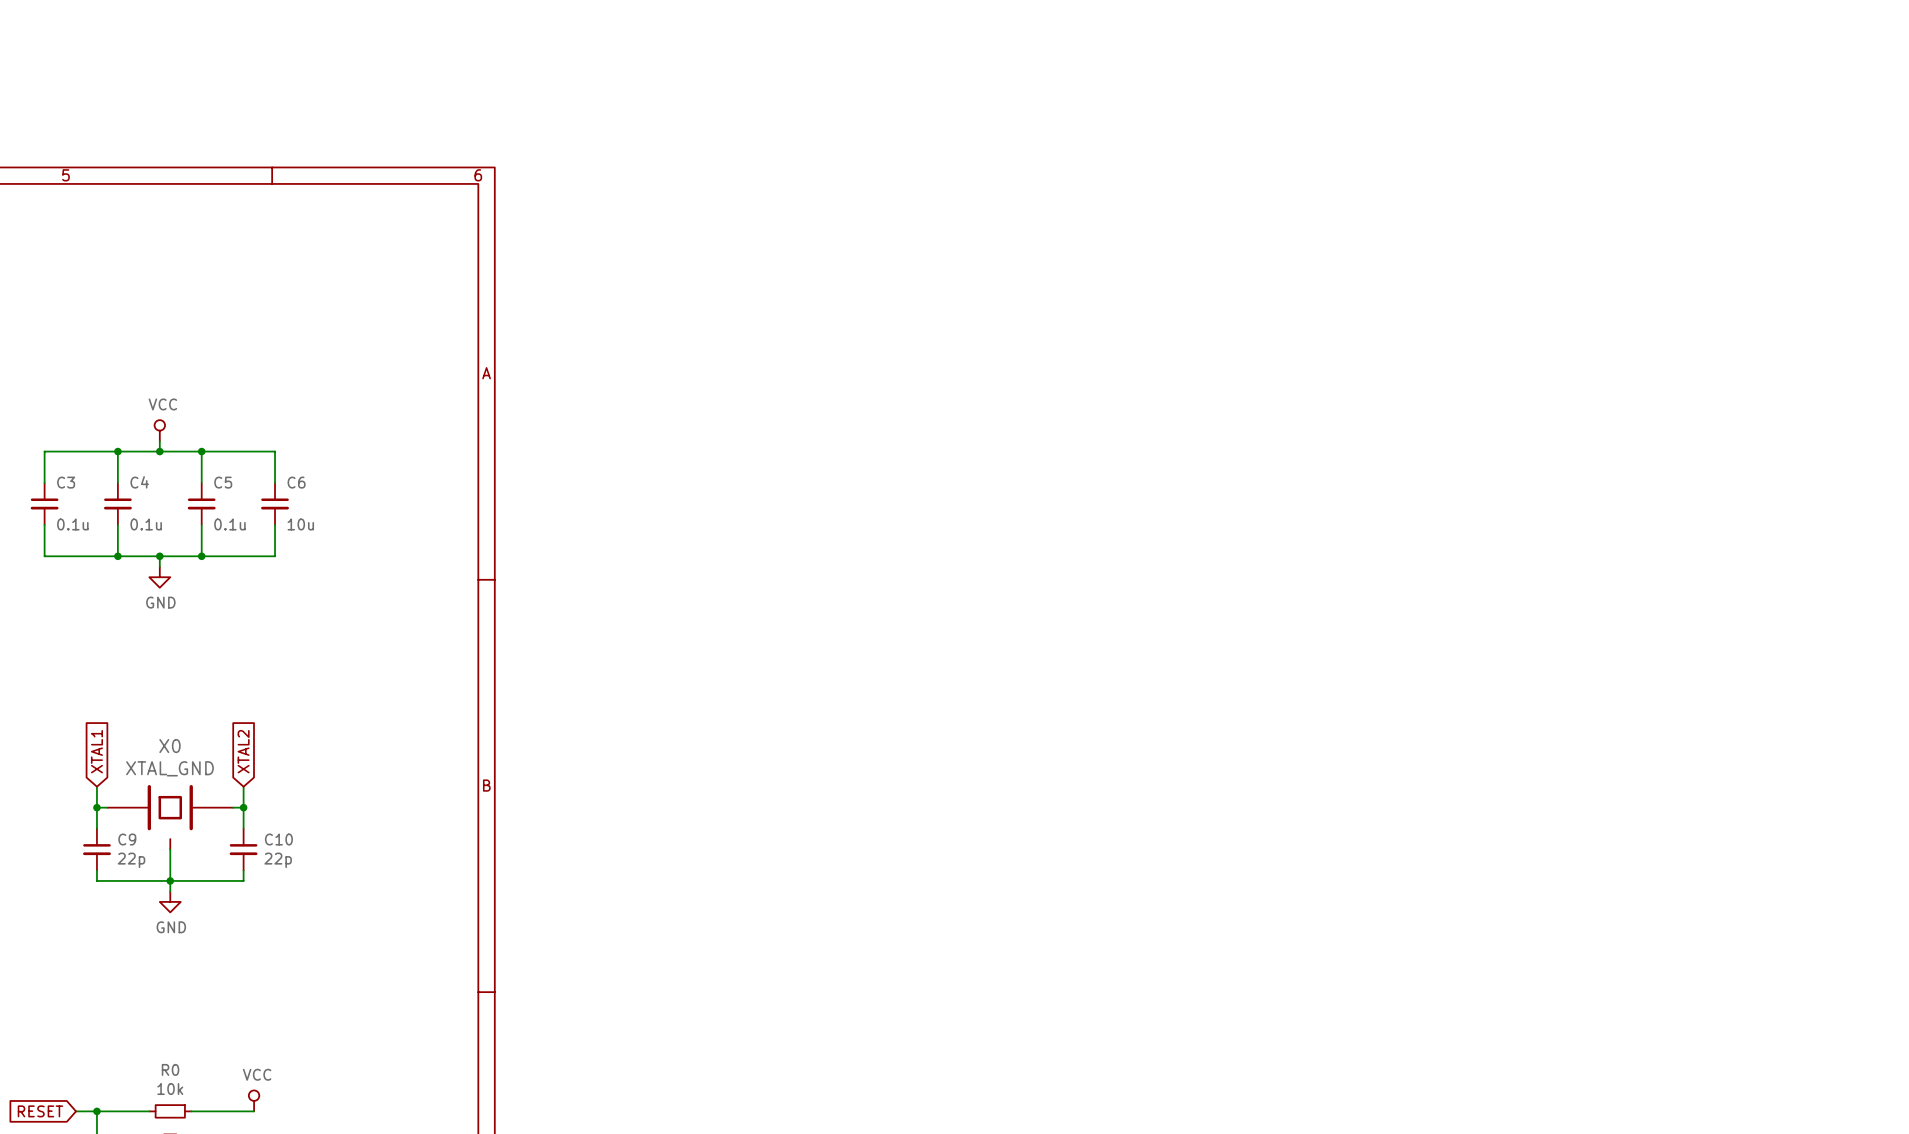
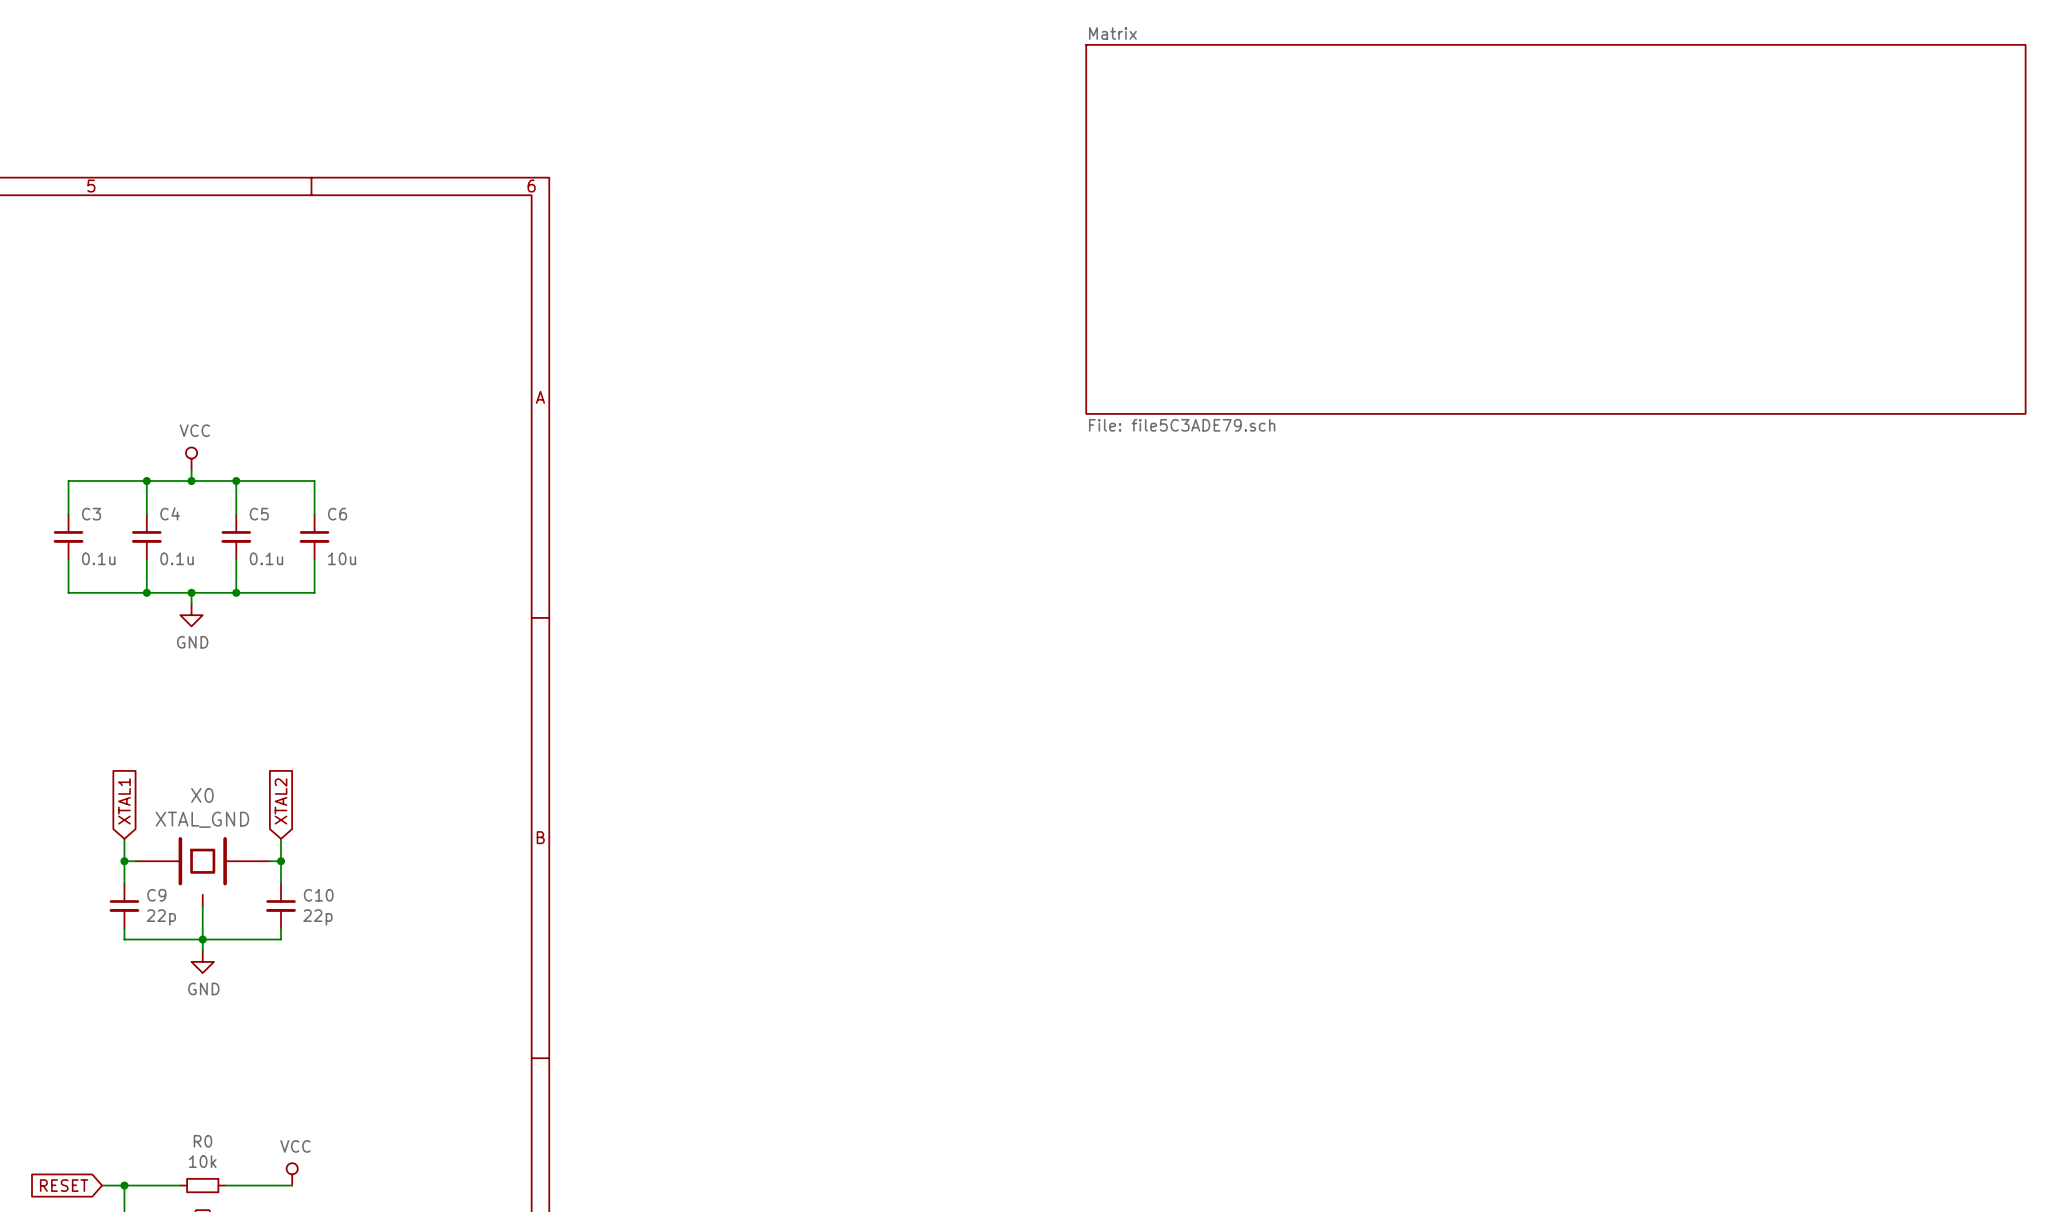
sheet Matrix: none -> File: file5C3ADE79.sch (1555, 229)

